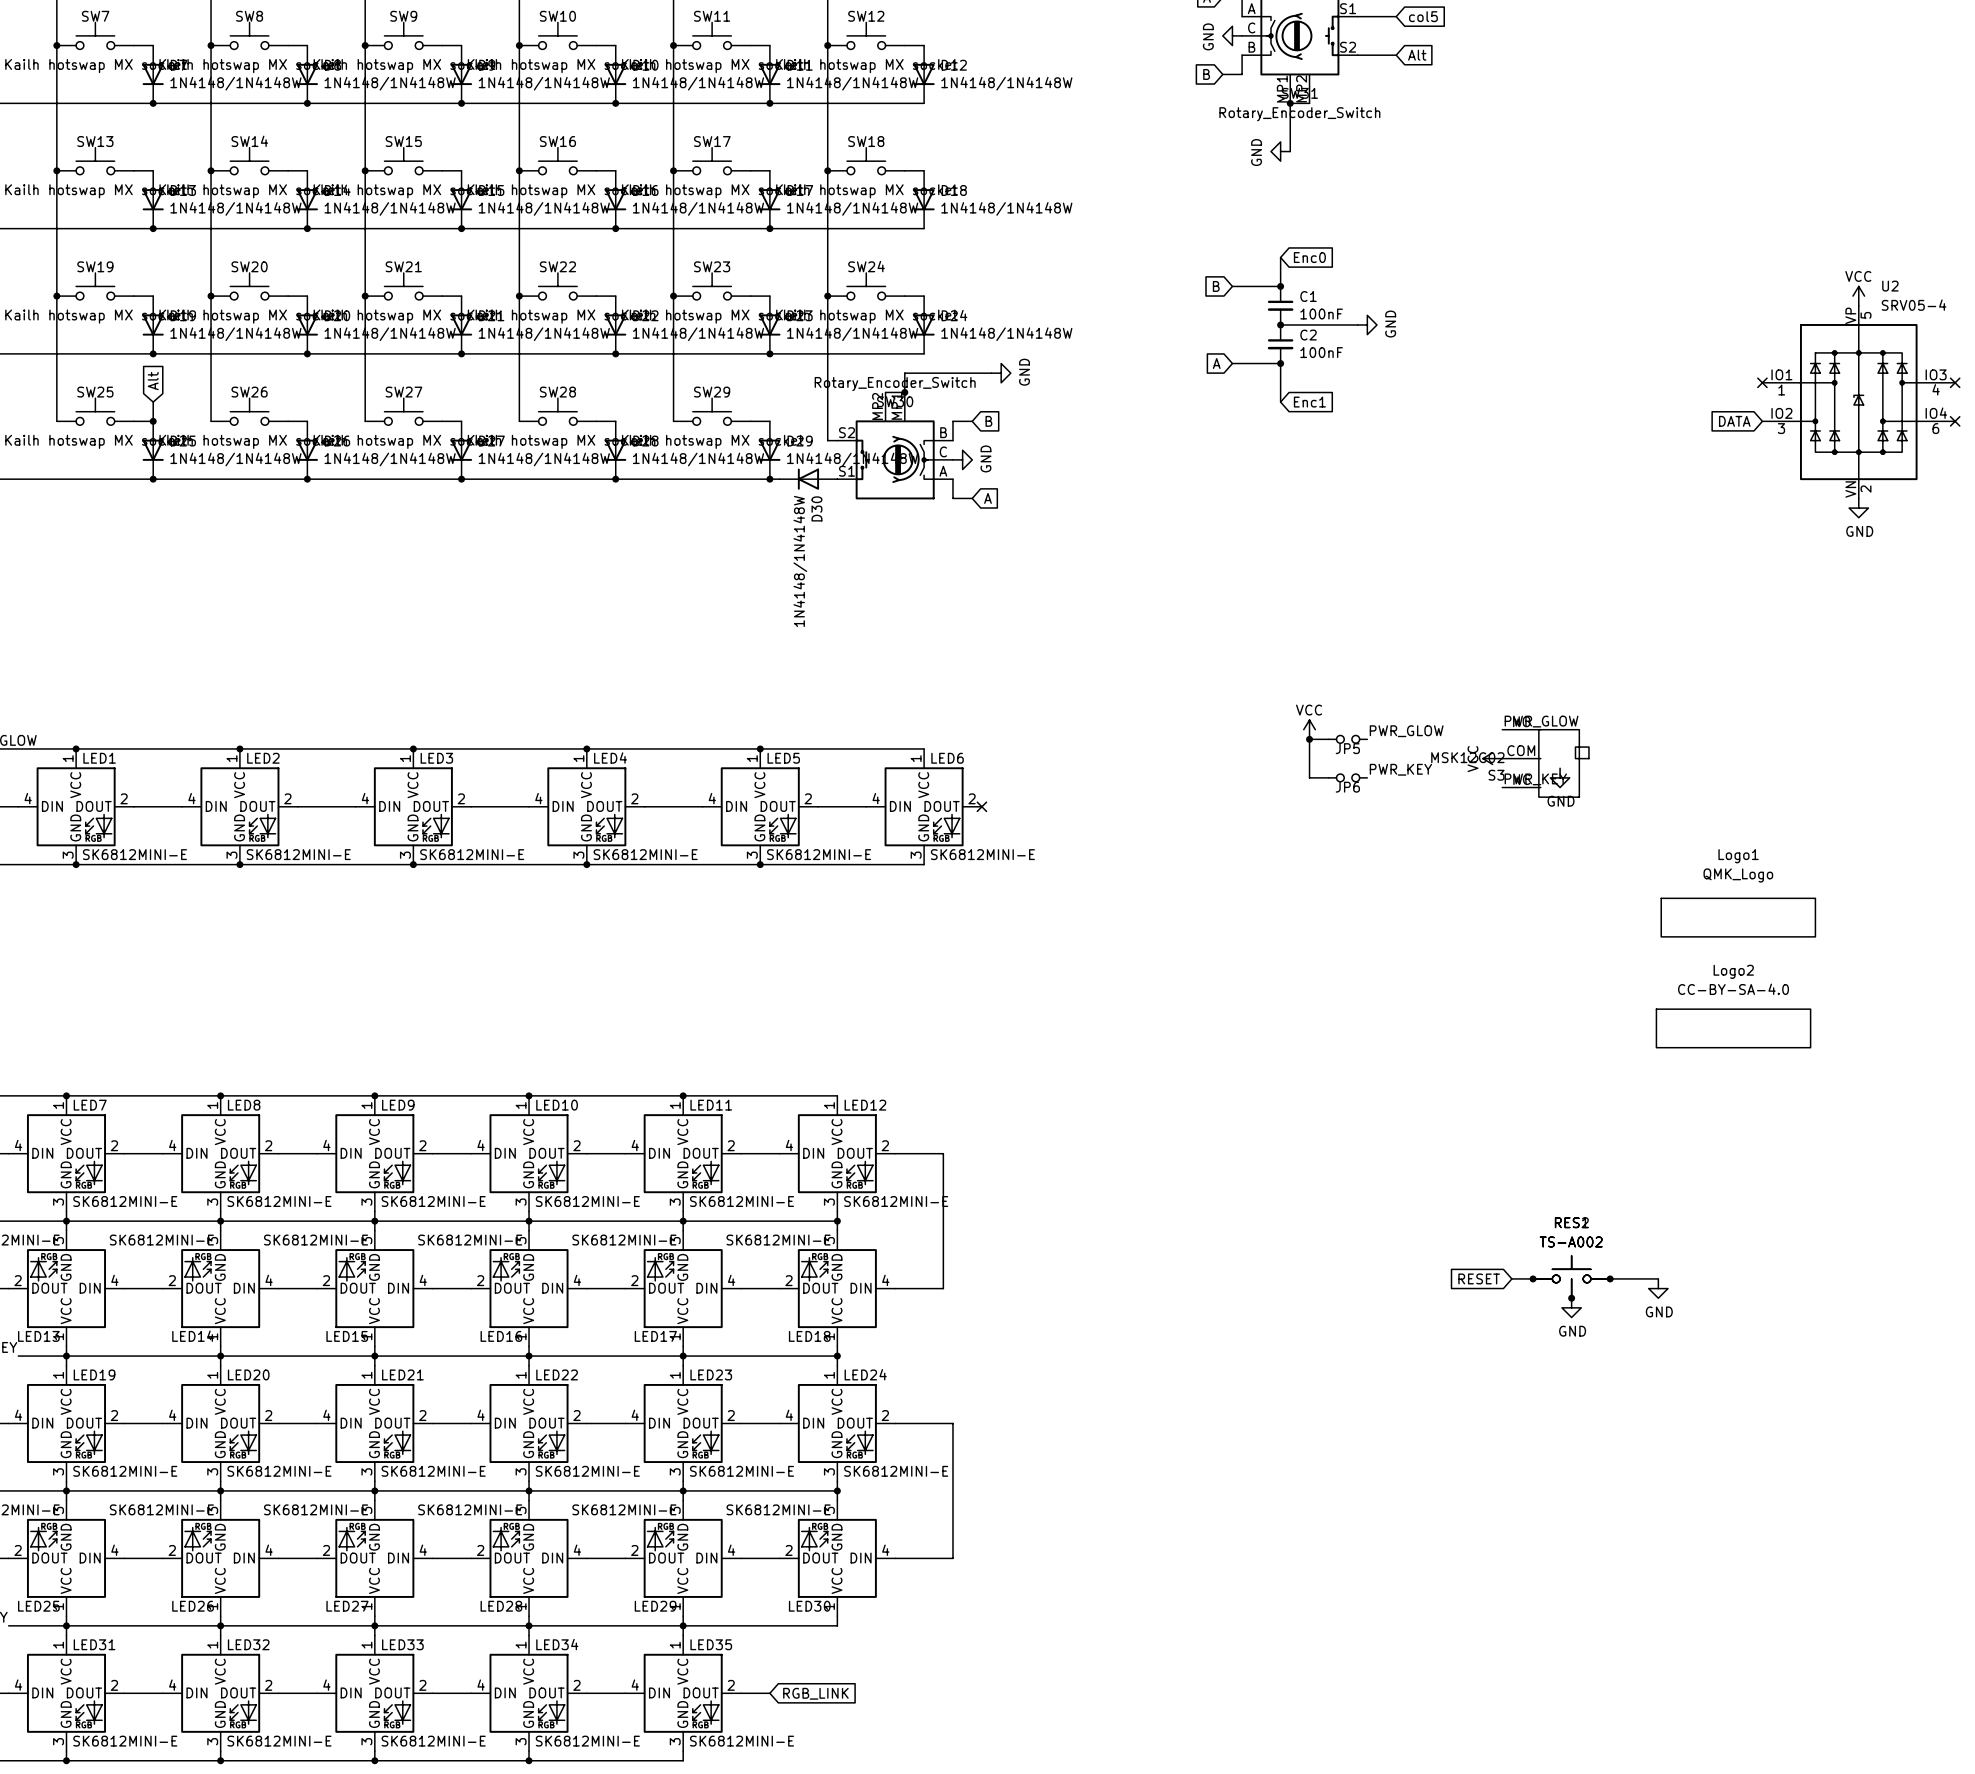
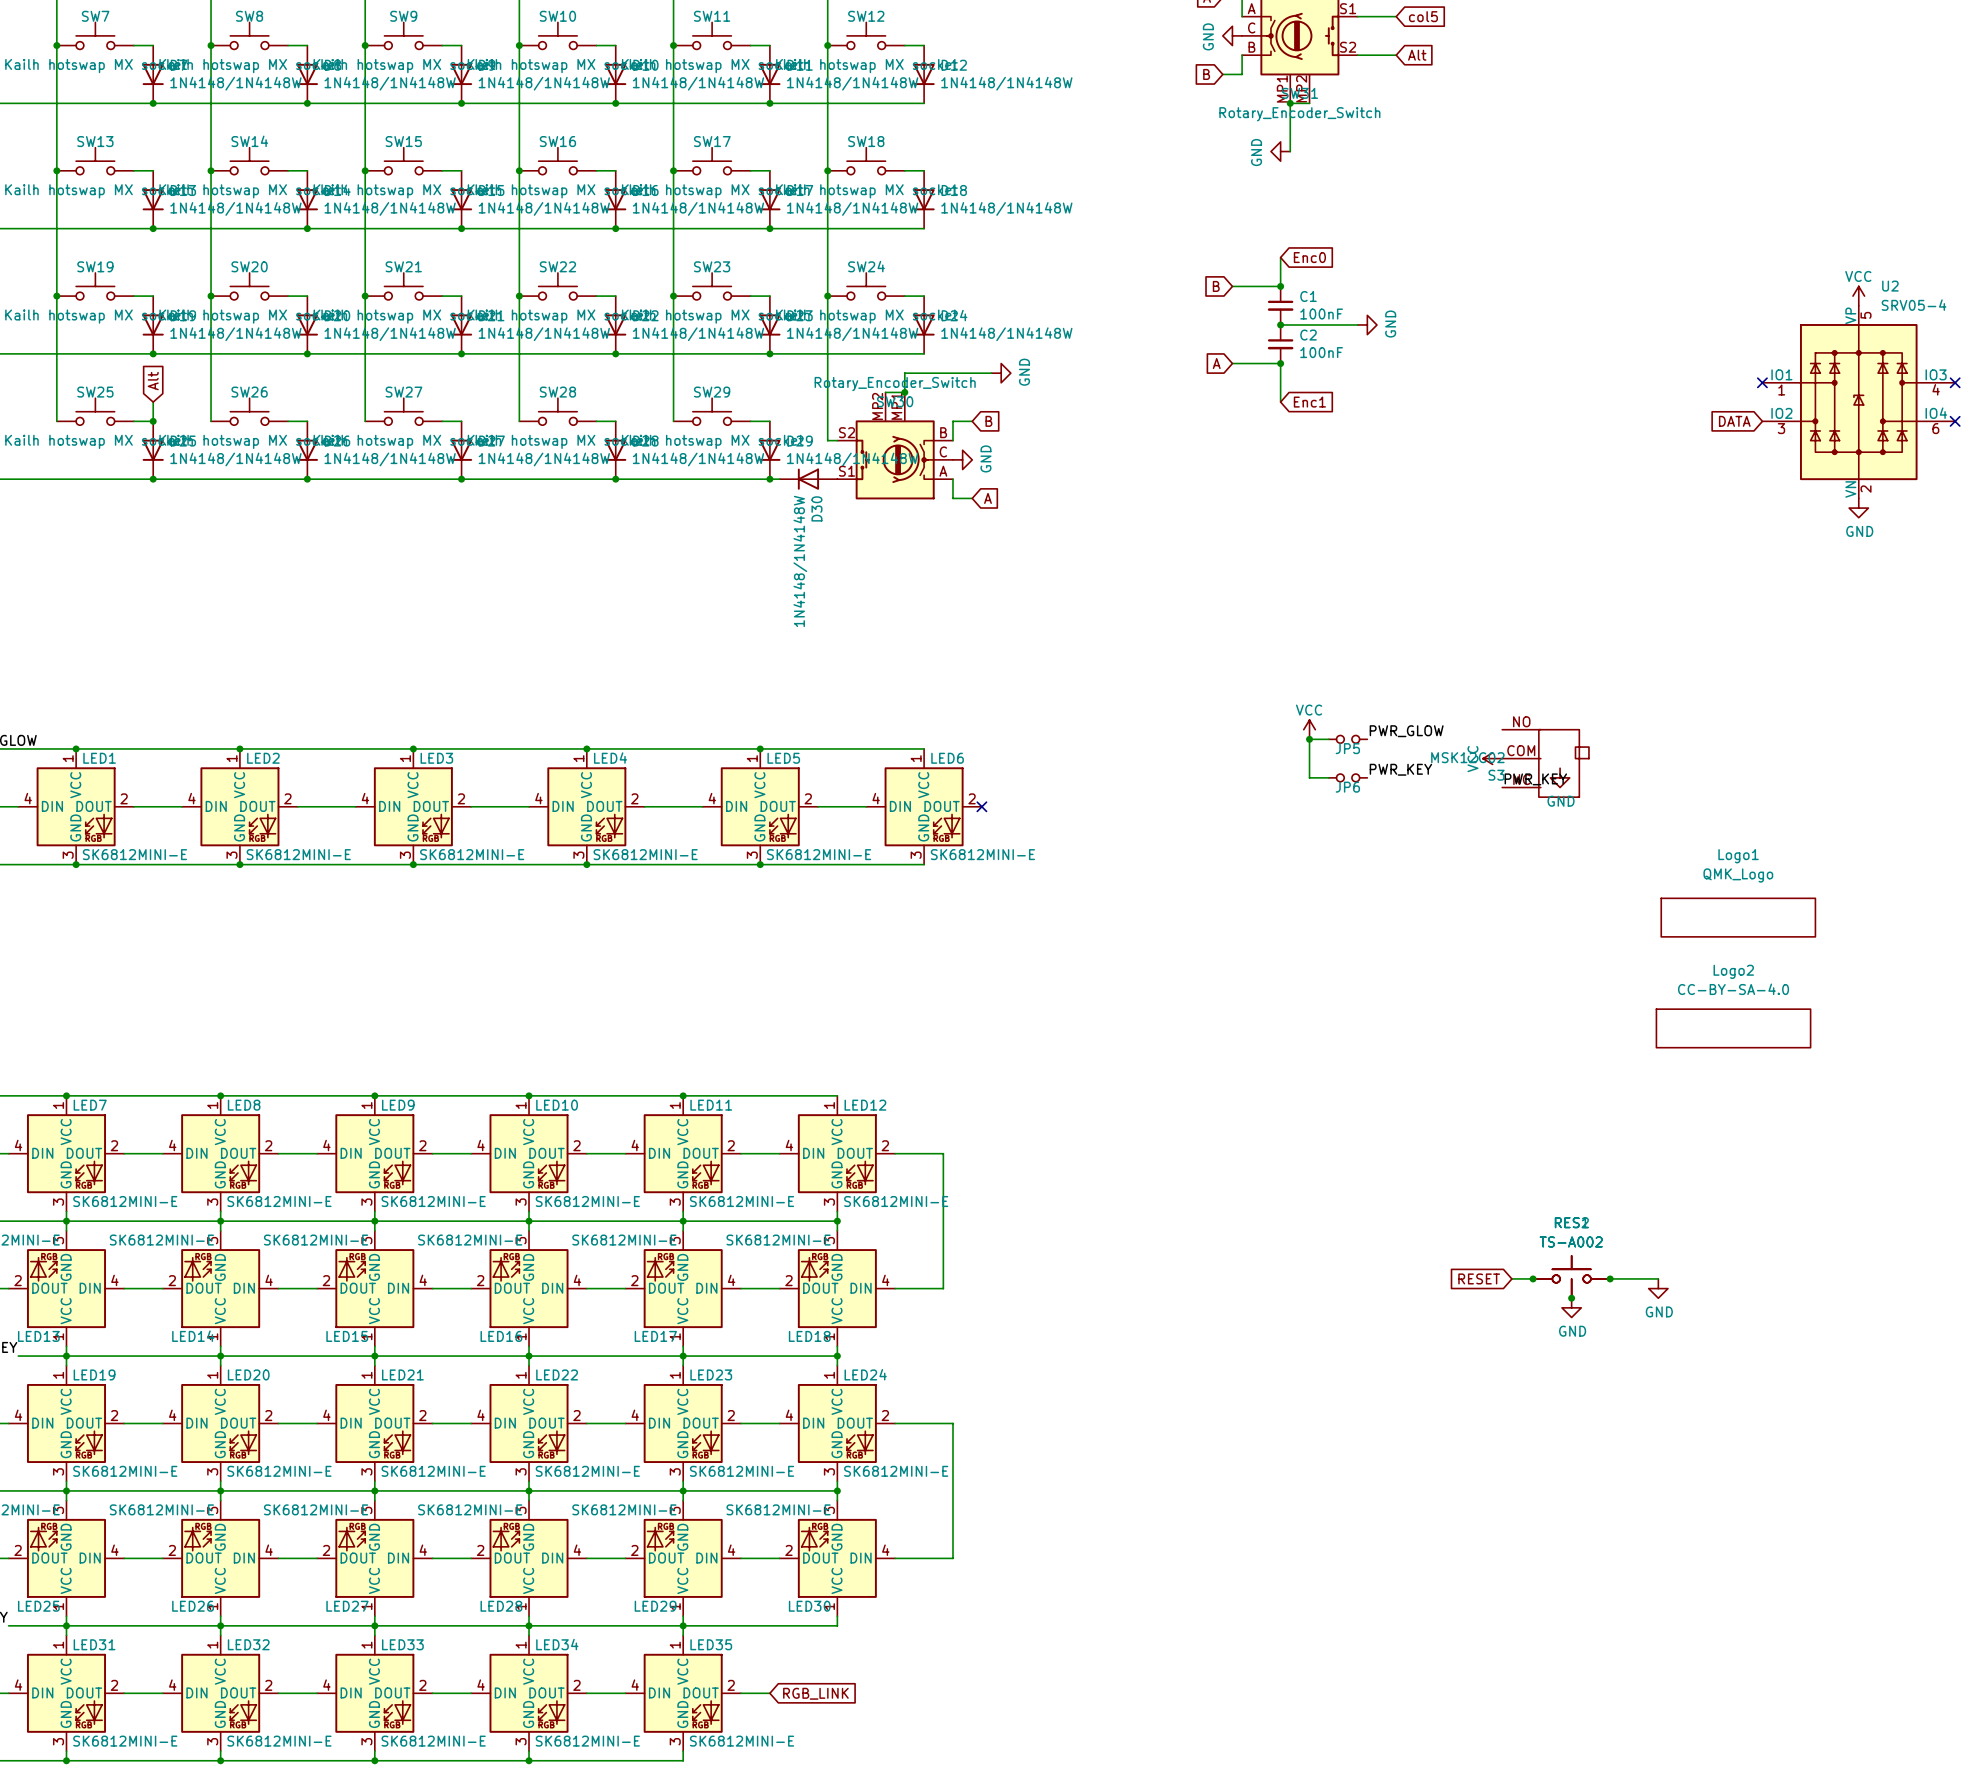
label: PWR_GLOW (1541, 721) -> none

